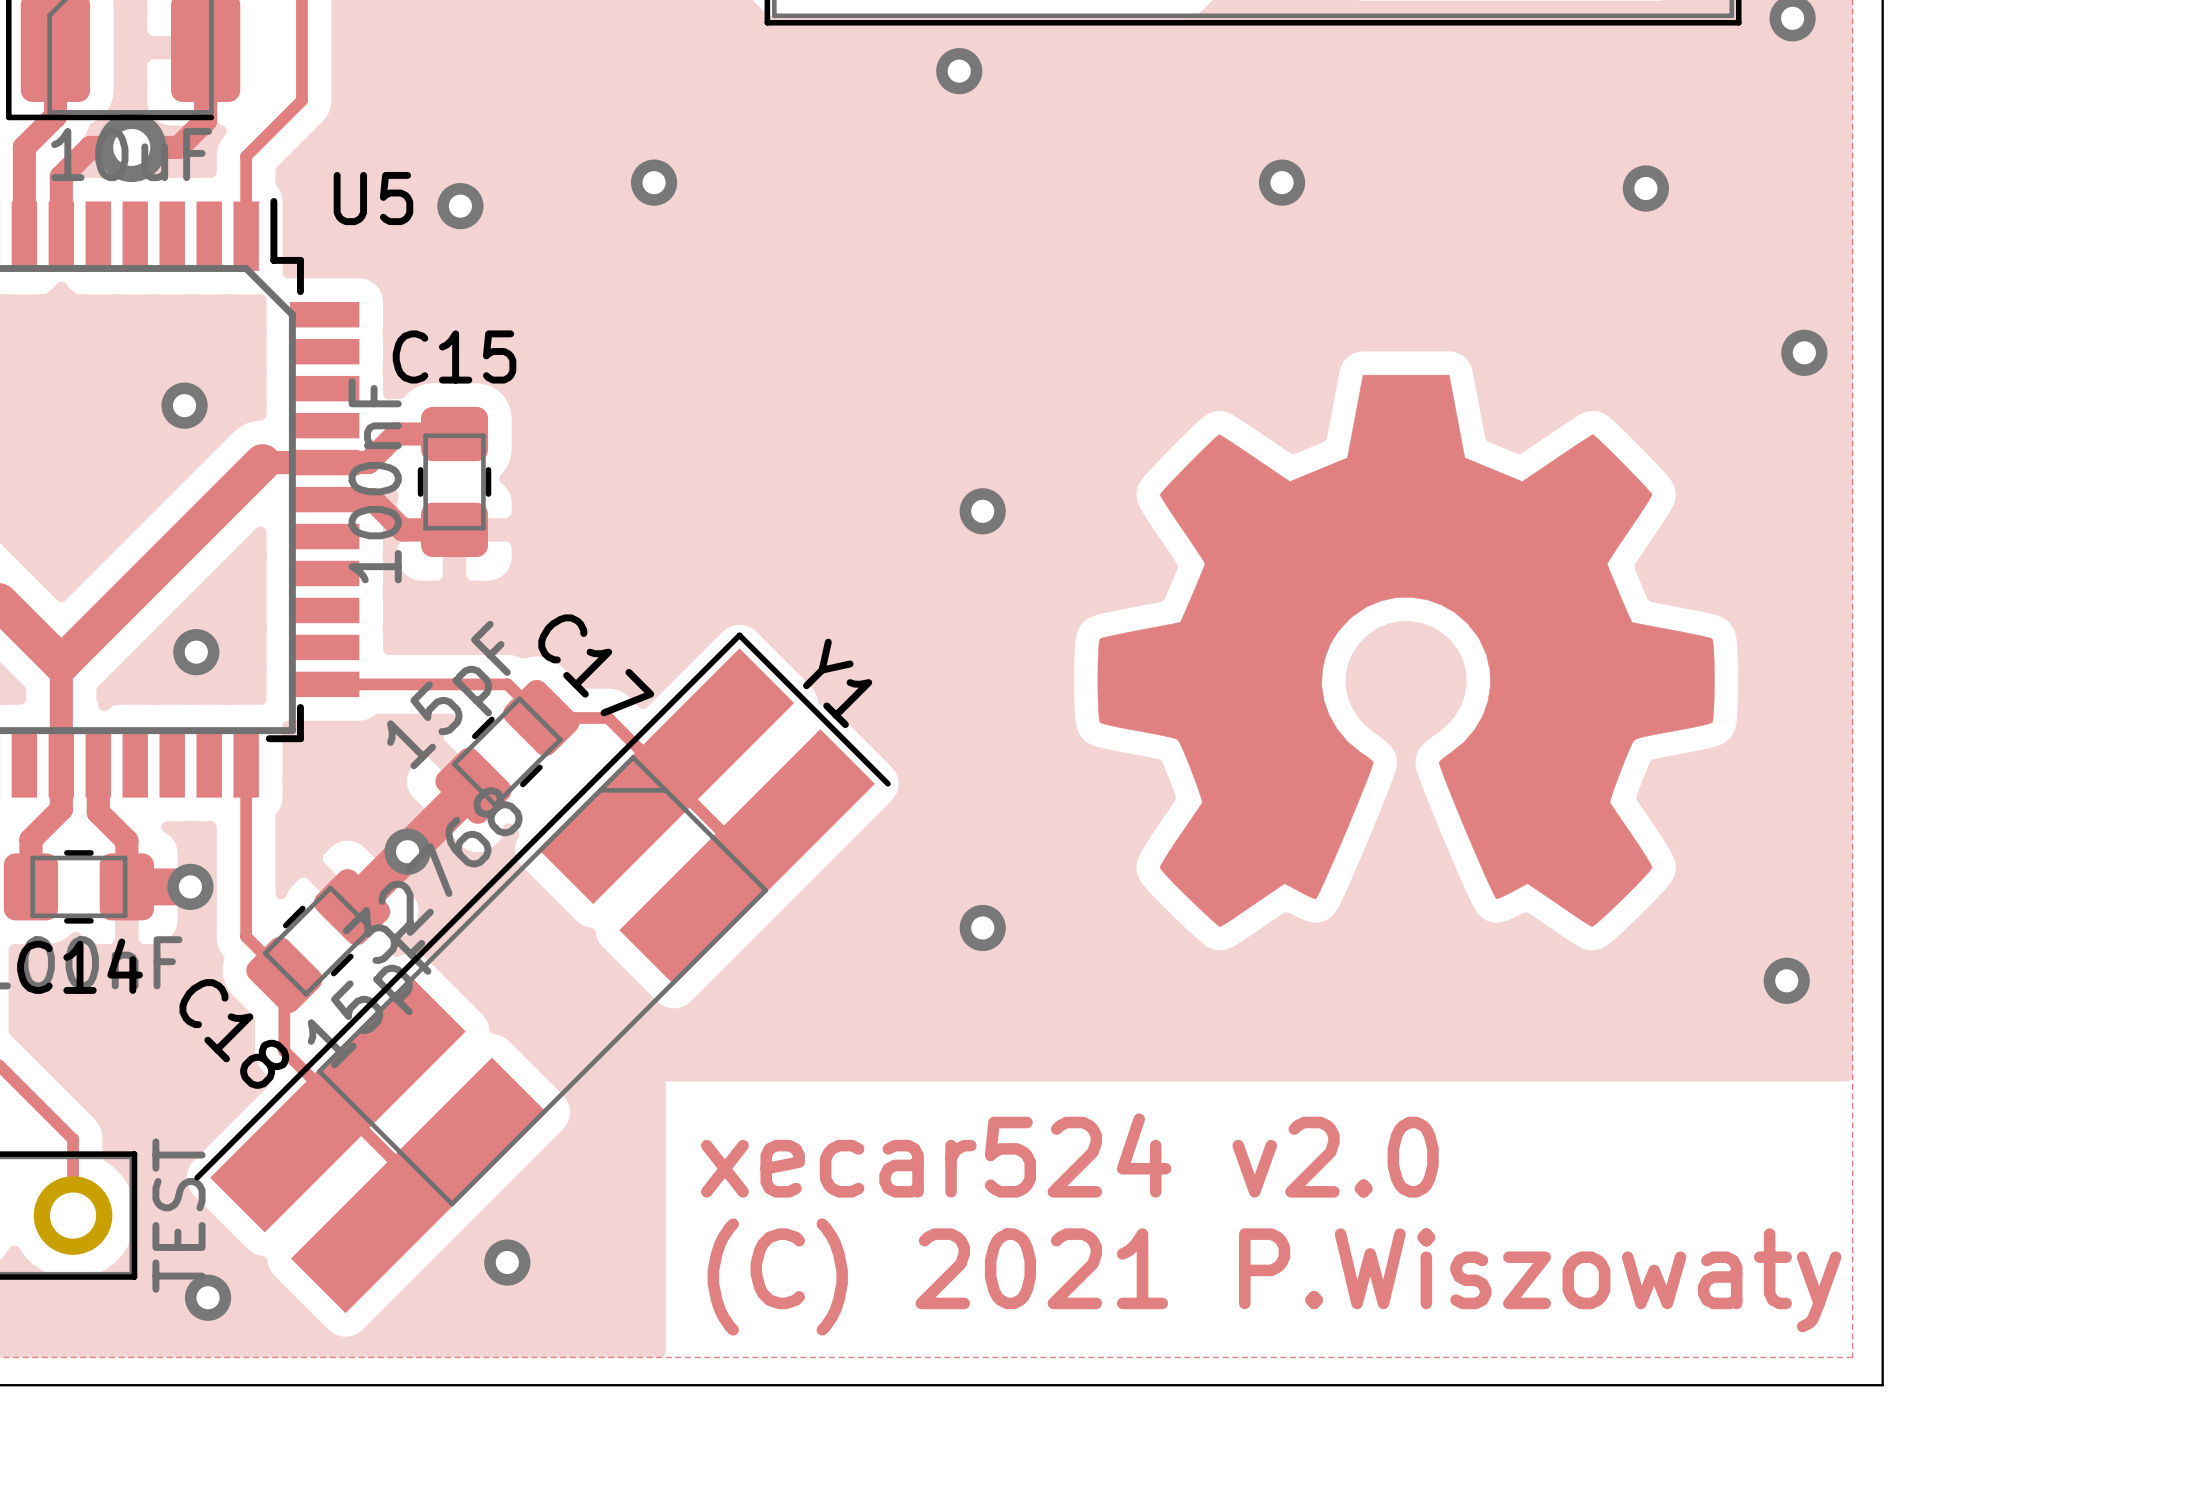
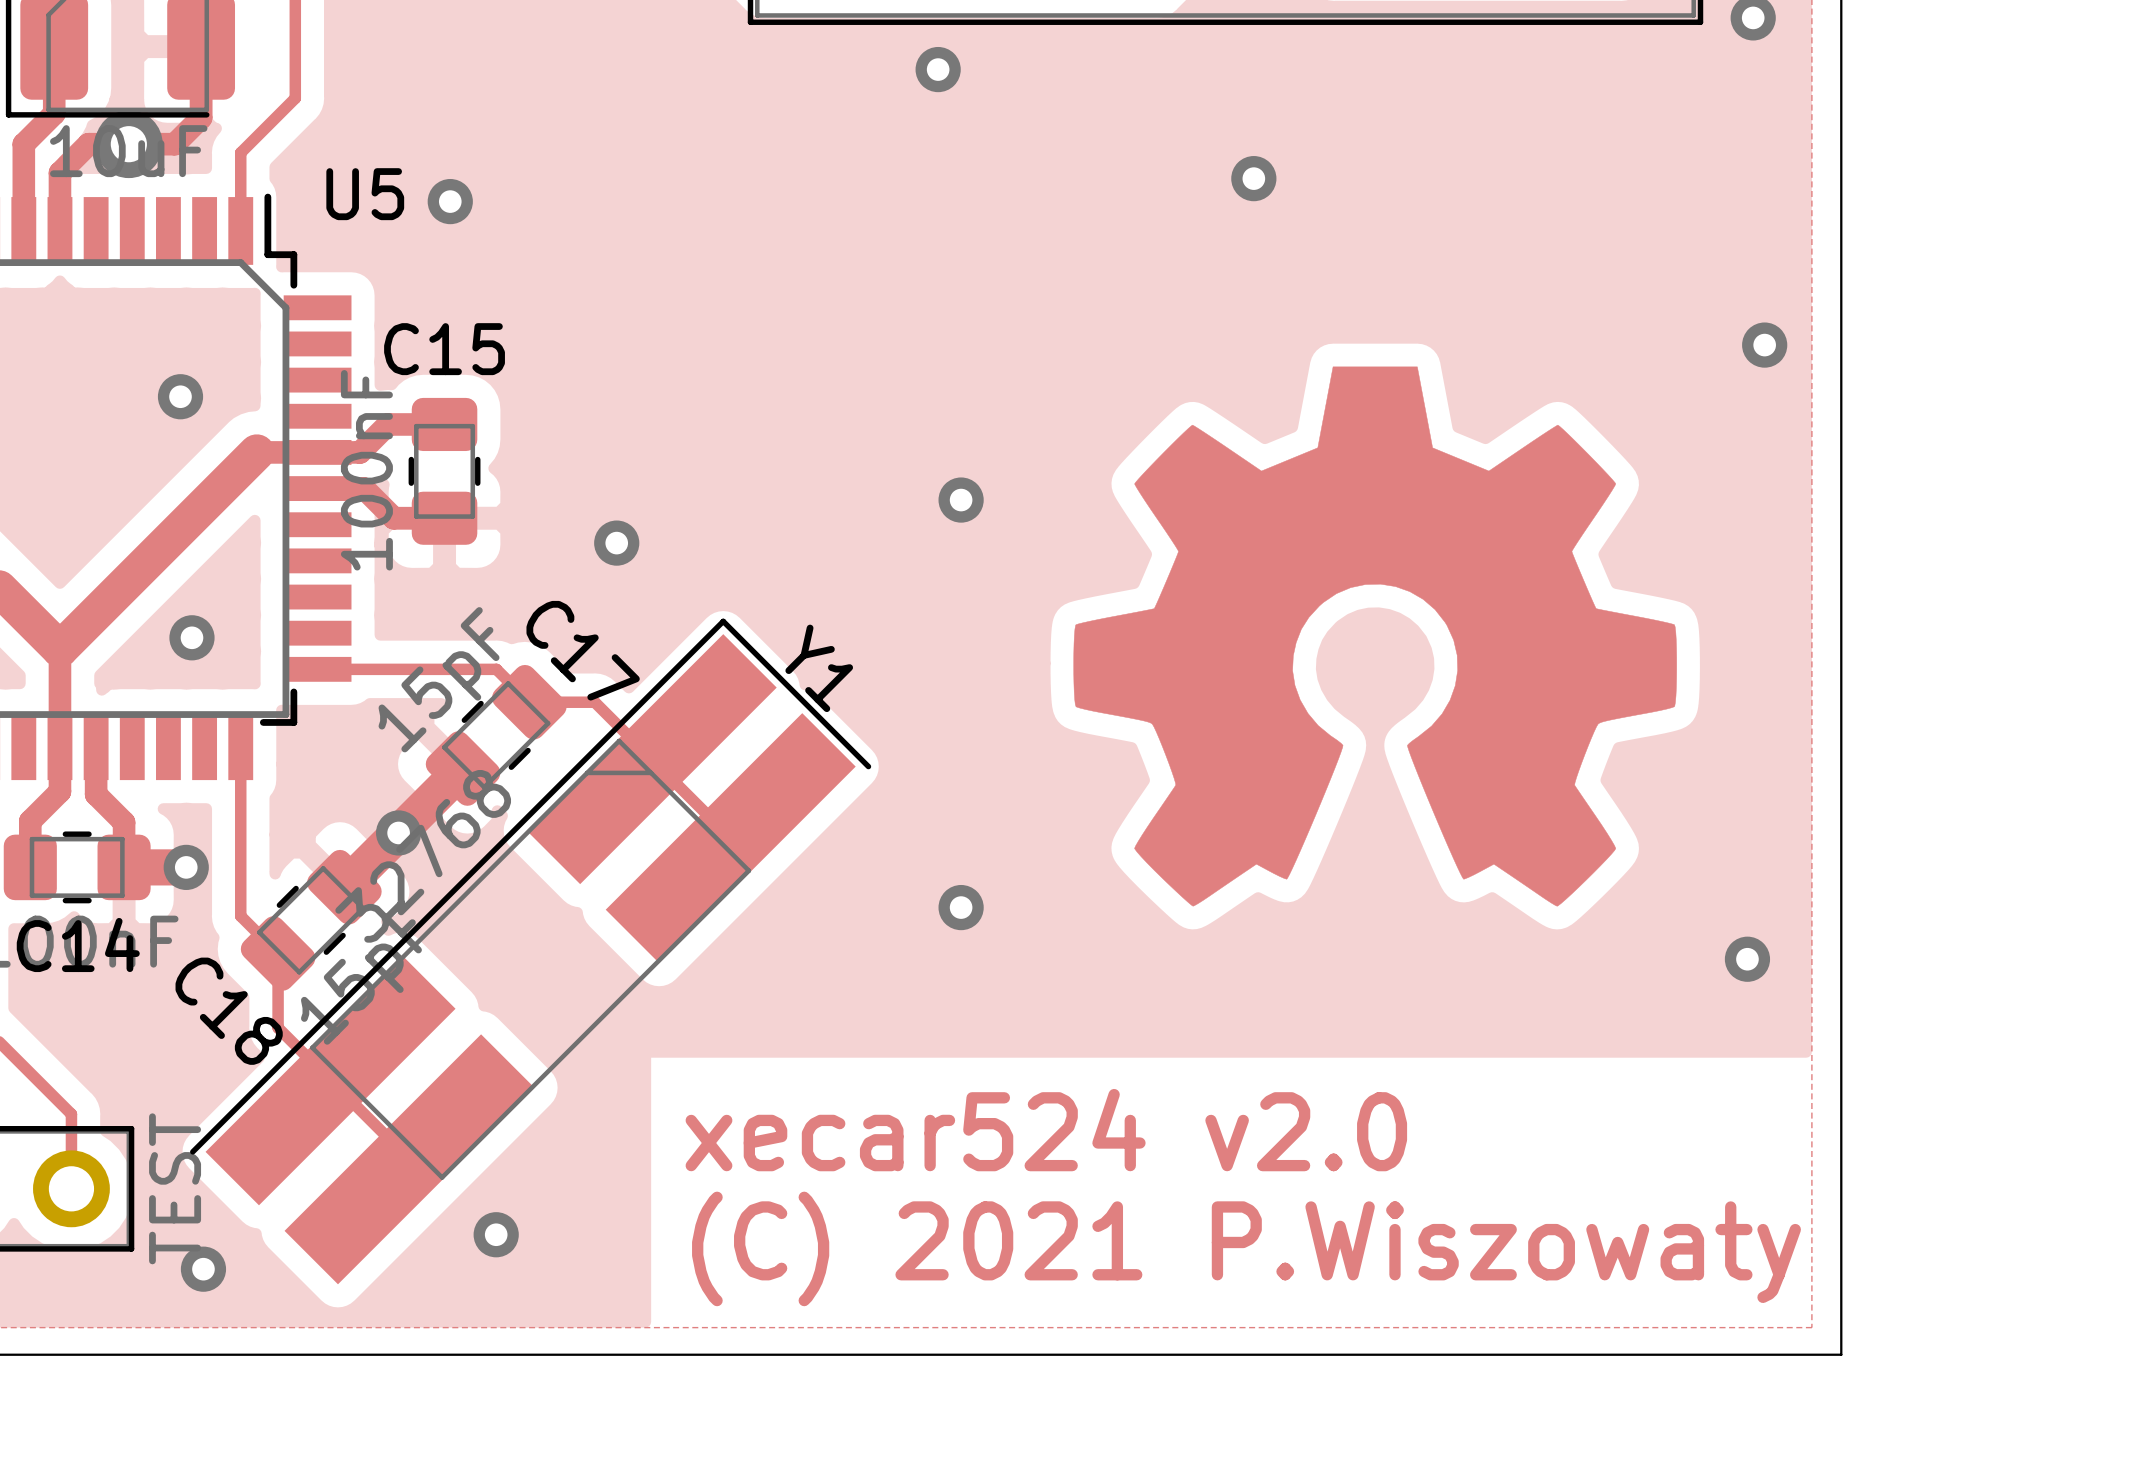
via: (654, 182) -> none
via: (1645, 188) -> none
via: none -> (616, 543)

